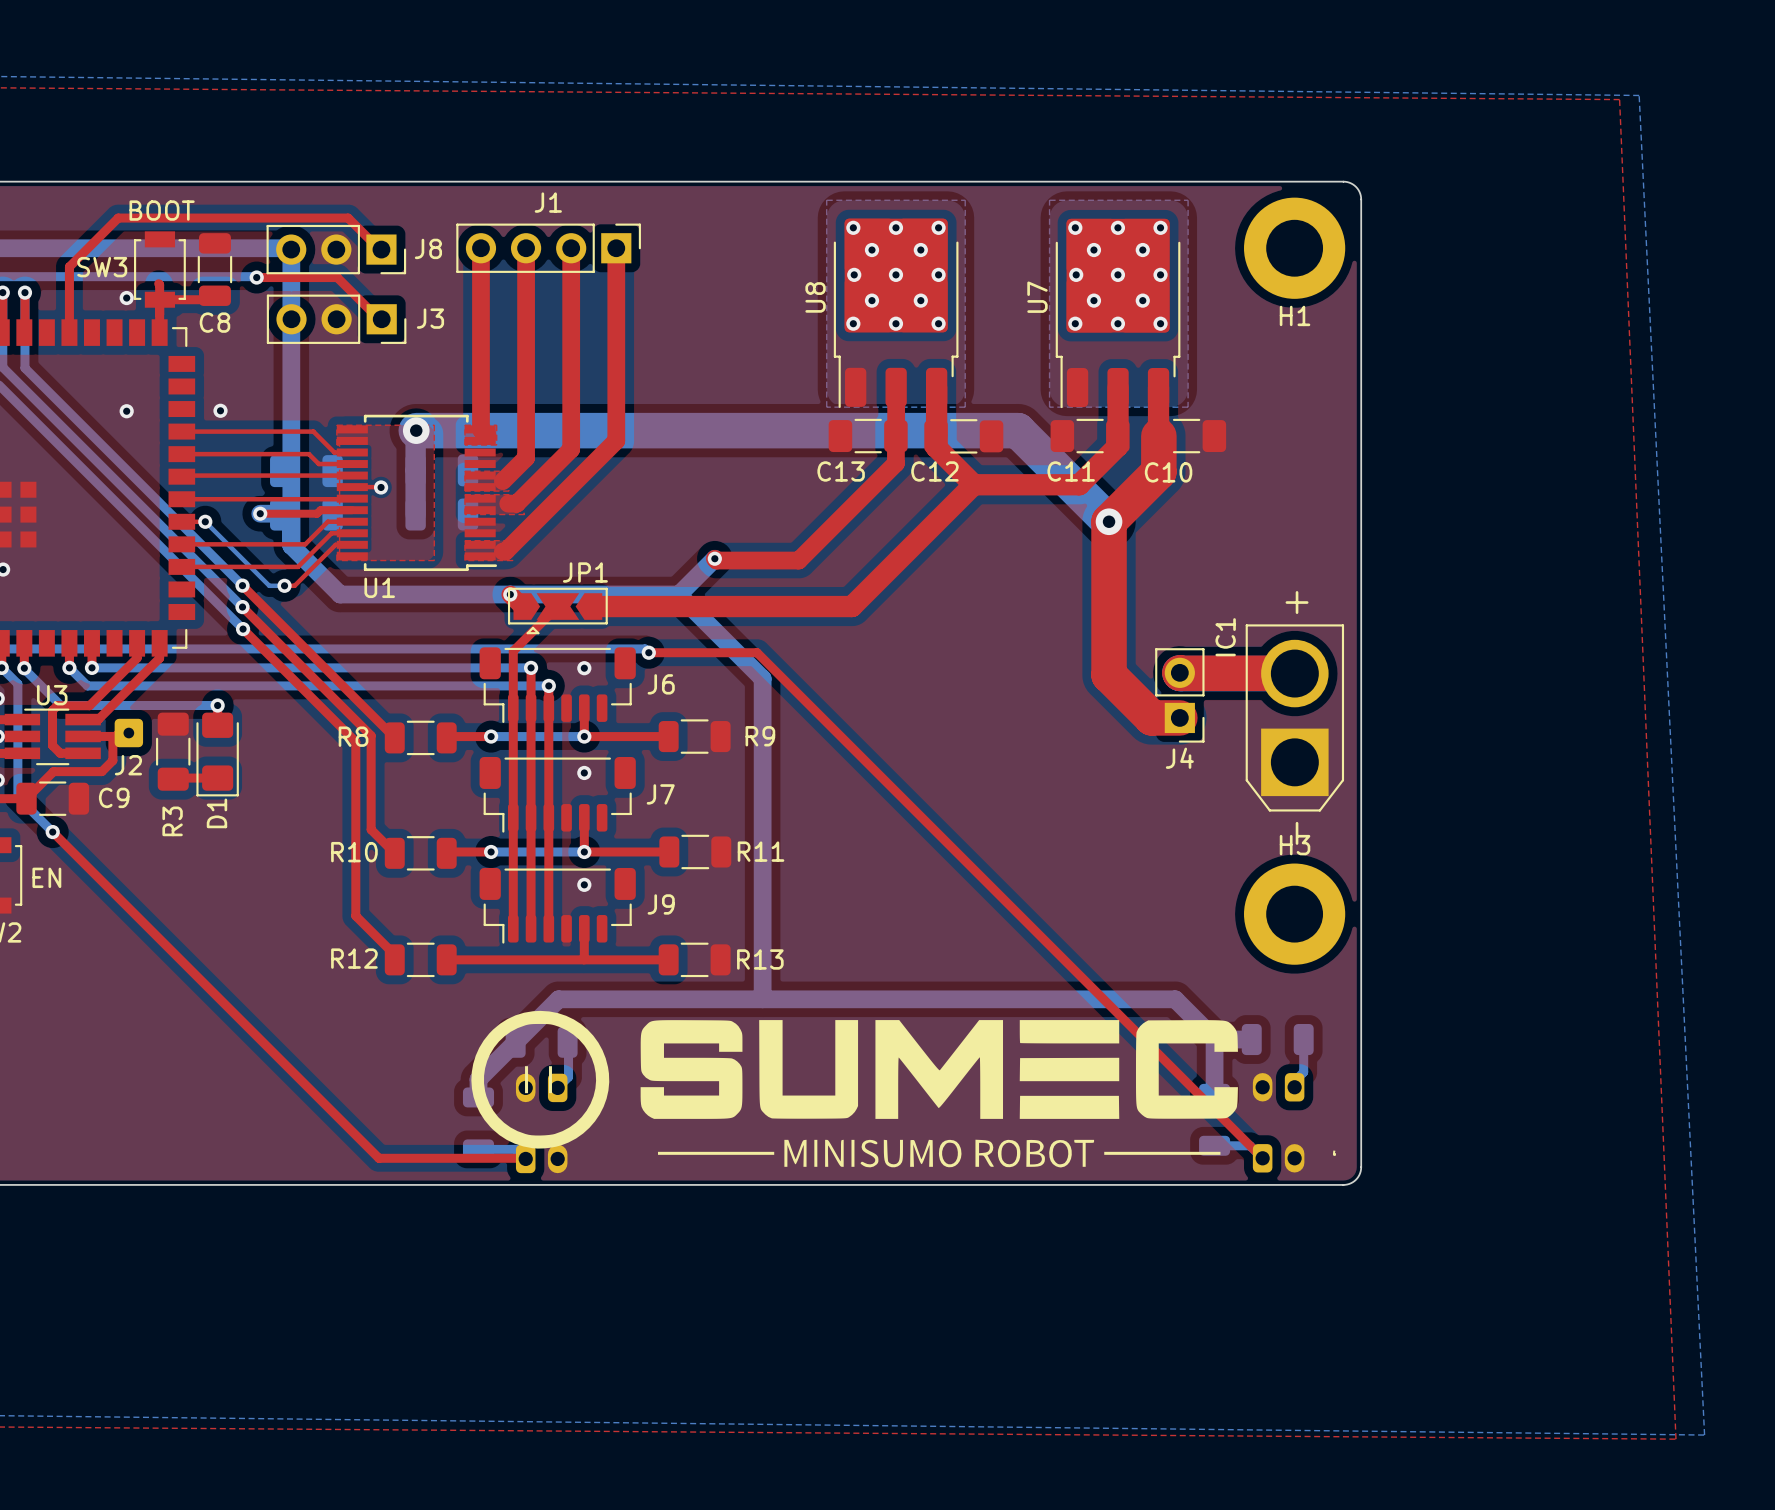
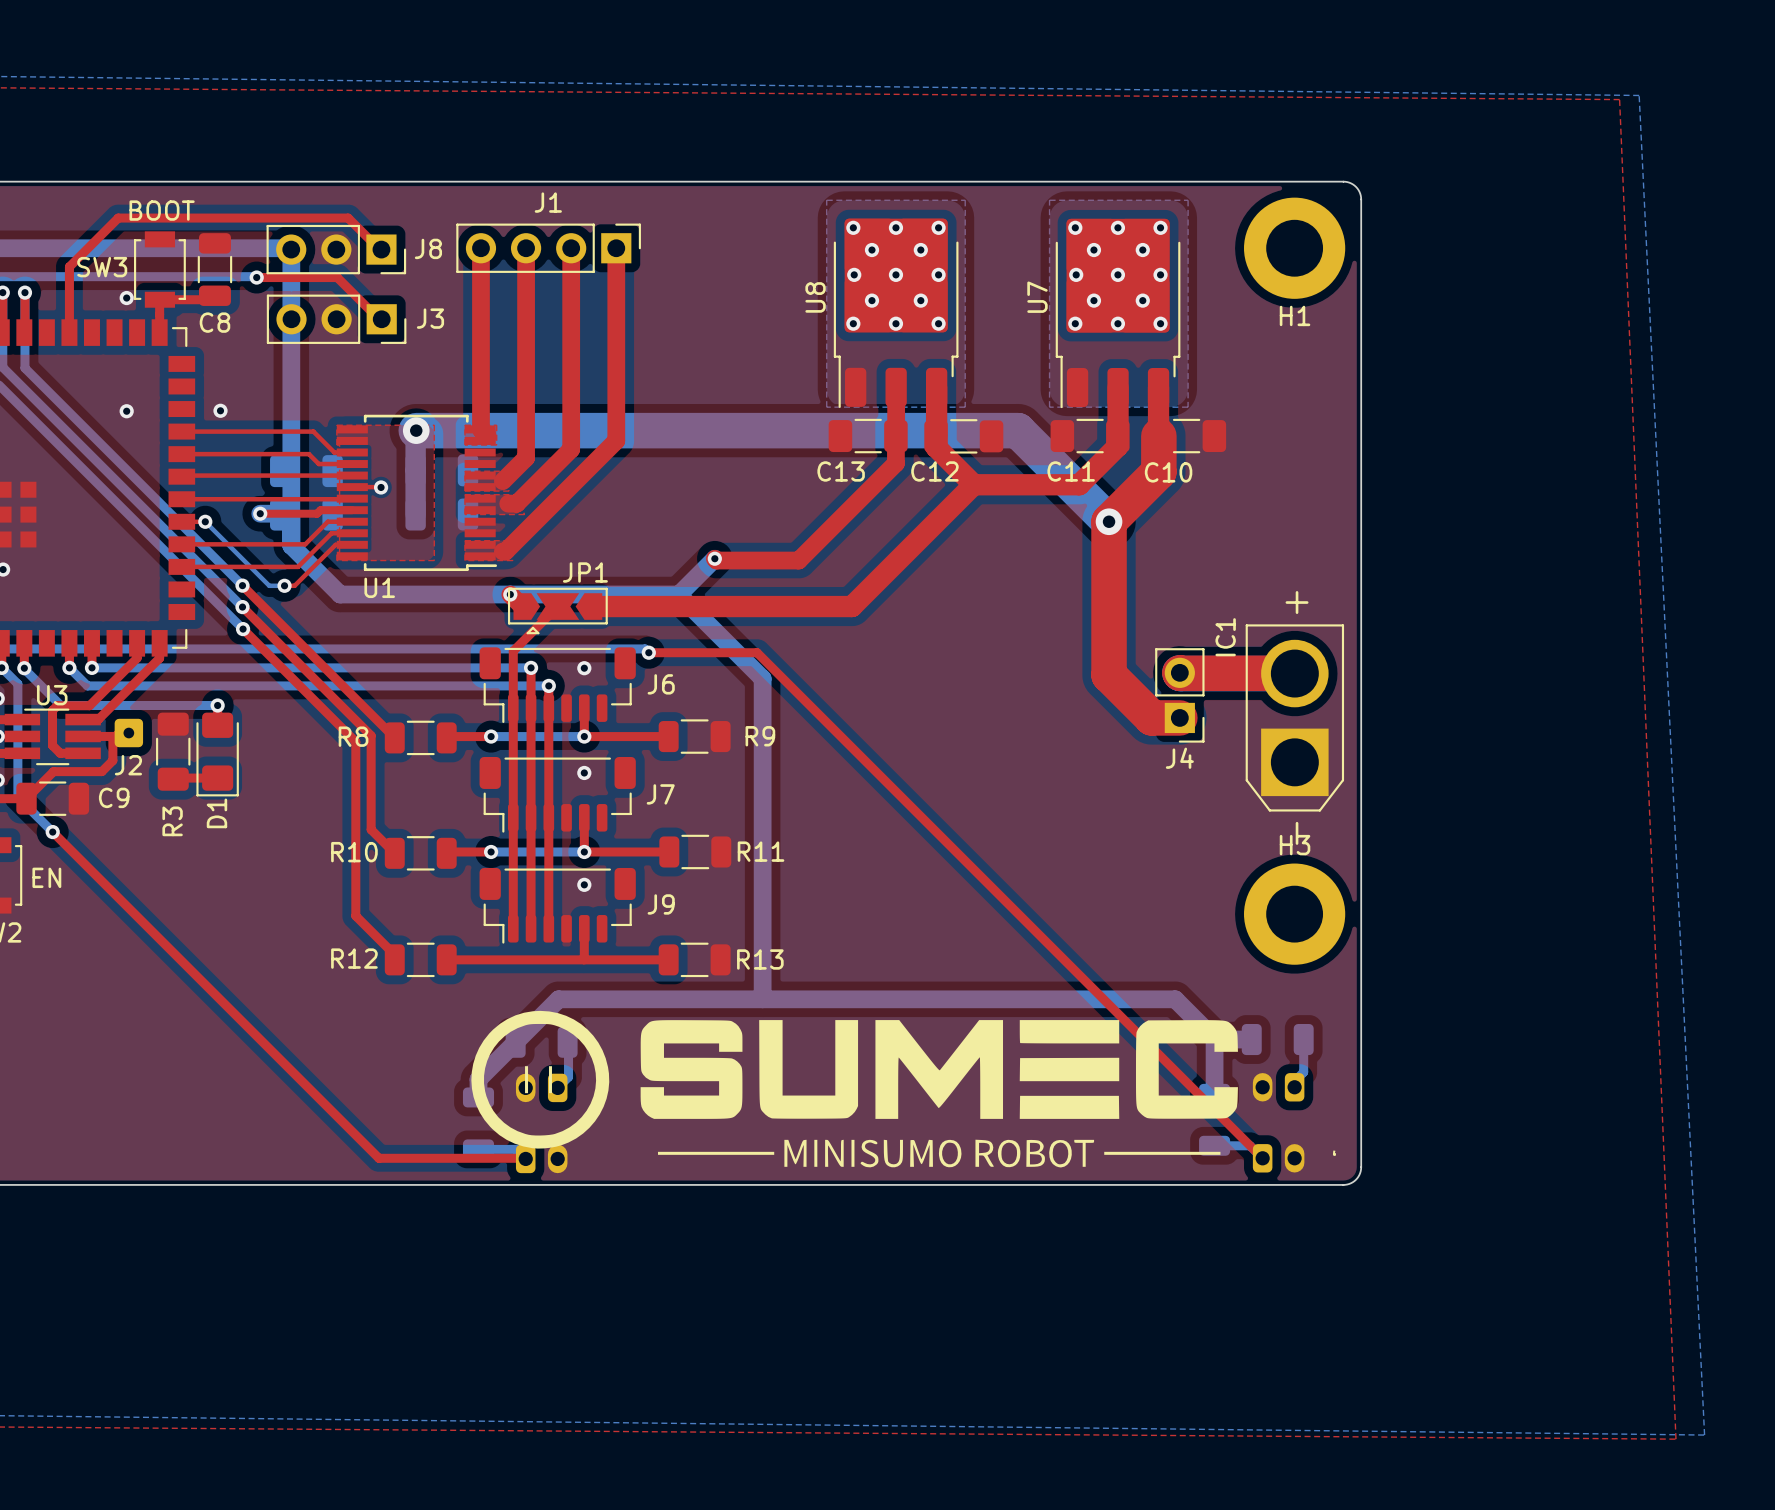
top track: (158, 283) (159, 299) -> none

